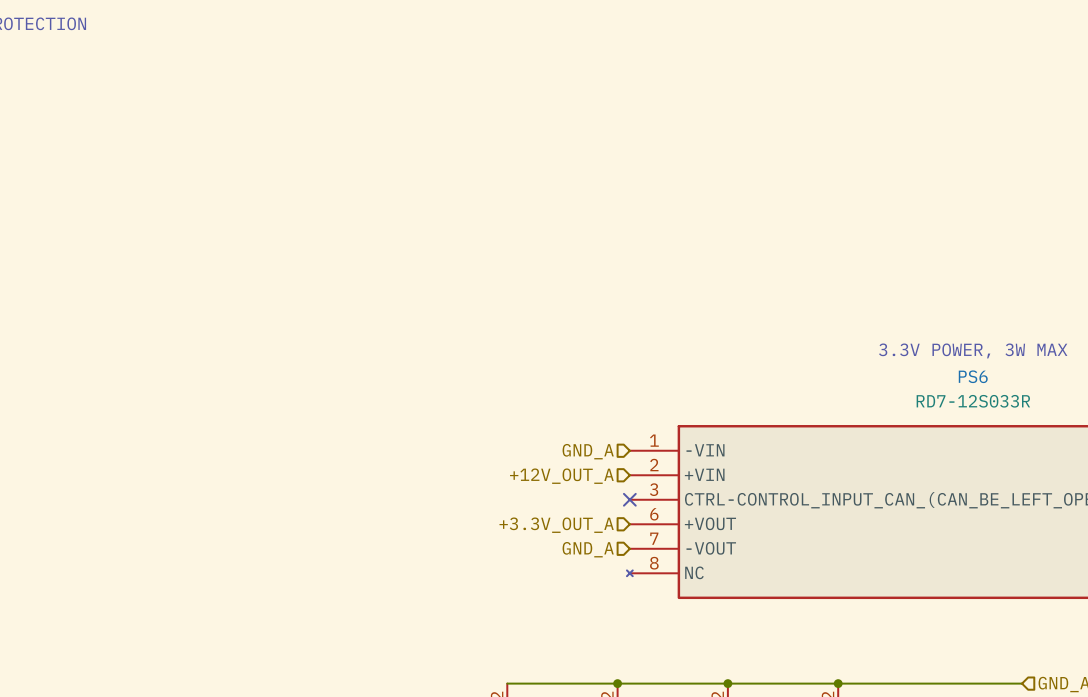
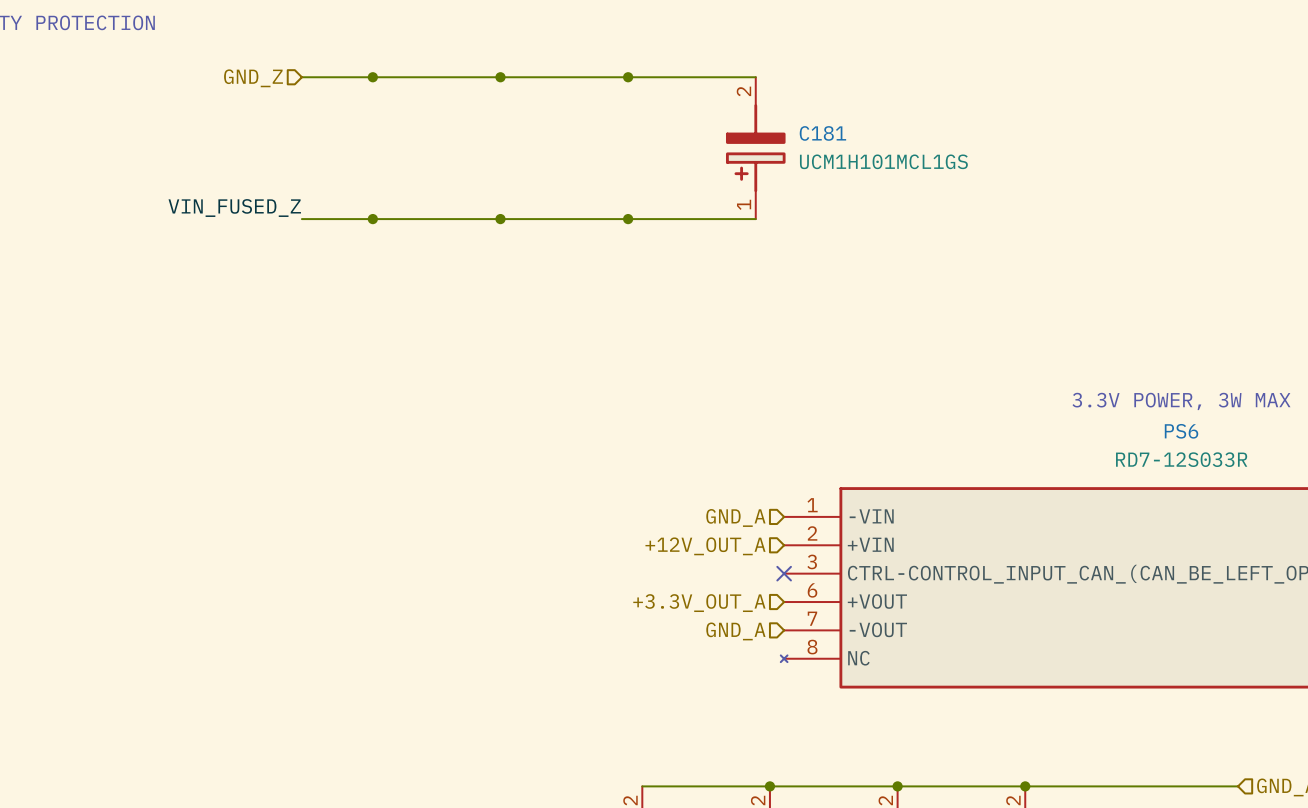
wire: none -> (301, 77) (755, 77)
junction: none -> (372, 77)
junction: none -> (500, 77)
junction: none -> (628, 77)
hierarchical label: none -> GND_Z (253, 78)
C181: none -> UCM1H101MCL1GS (755, 148)
label: none -> VIN_FUSED_Z (234, 208)
wire: none -> (301, 219) (755, 219)
junction: none -> (372, 219)
junction: none -> (500, 219)
junction: none -> (628, 219)

